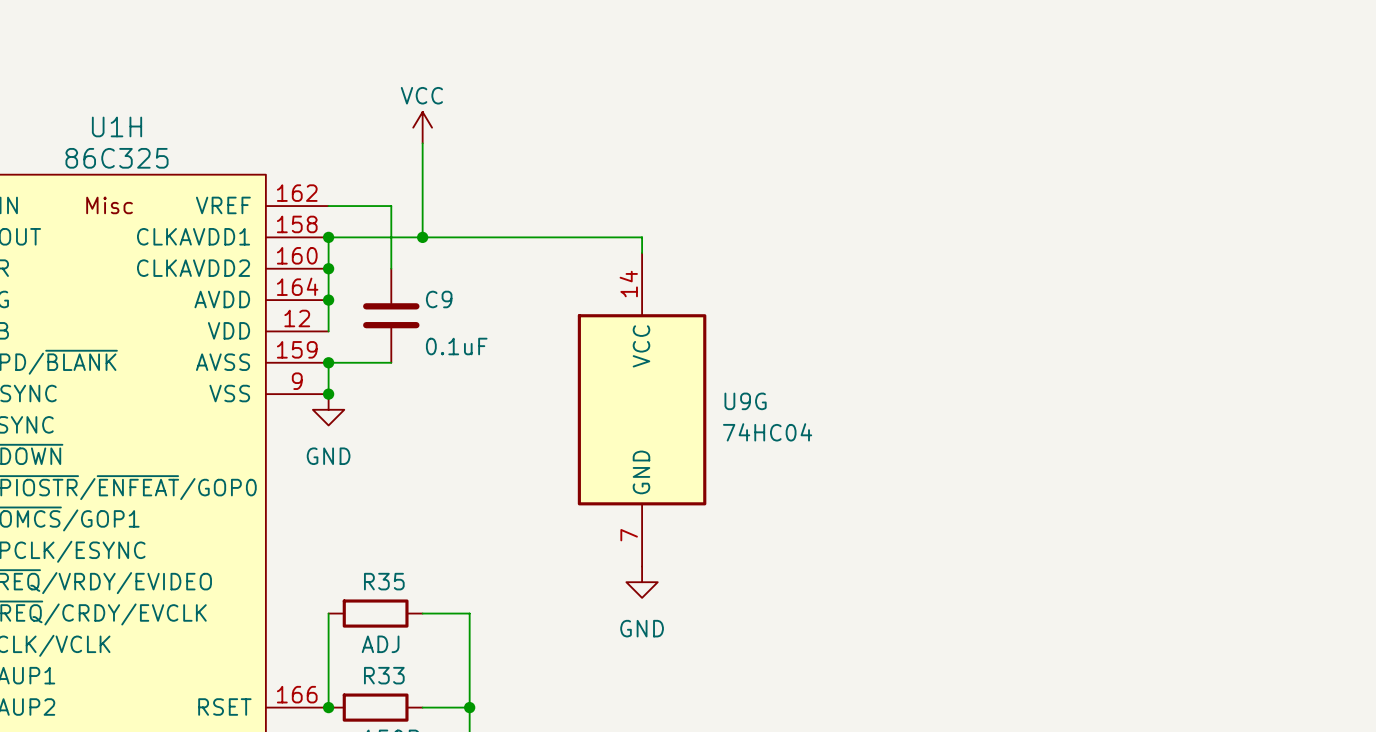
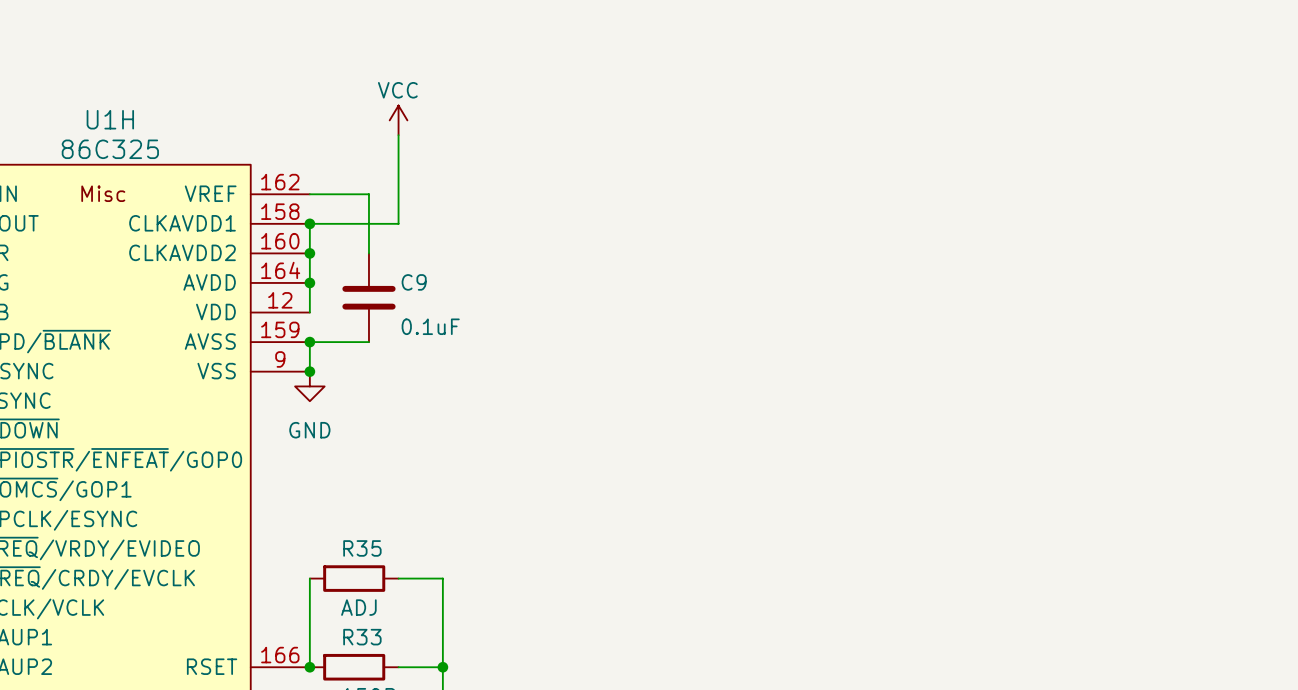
wire: (422, 237) (642, 237) (642, 253) -> none
junction: (422, 237) -> none
U9G: 74HC04 (642, 409) -> none
power symbol: GND (642, 582) -> none

